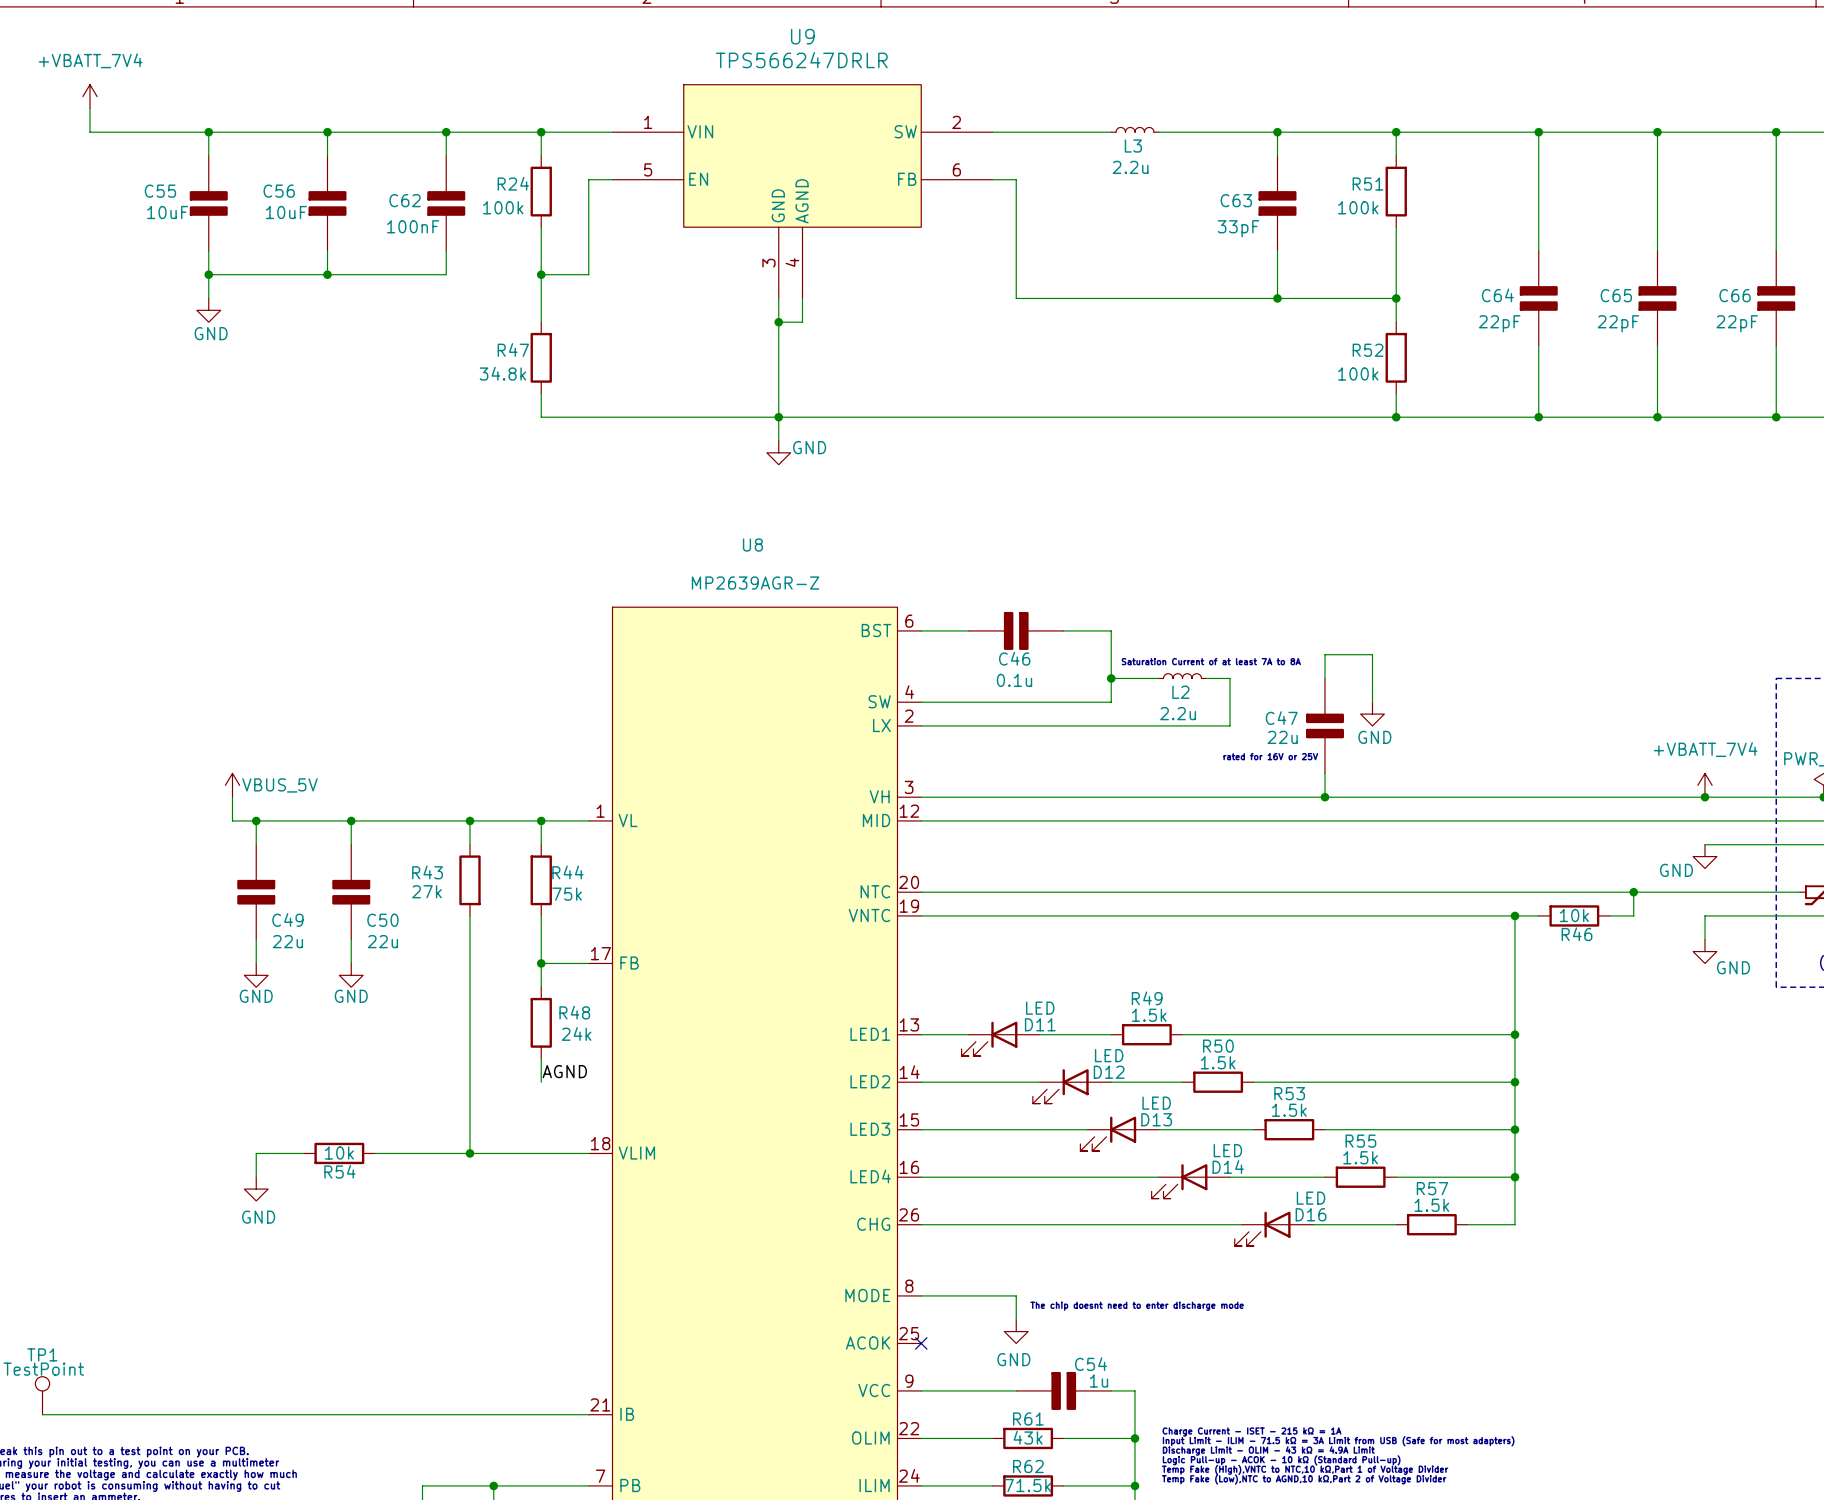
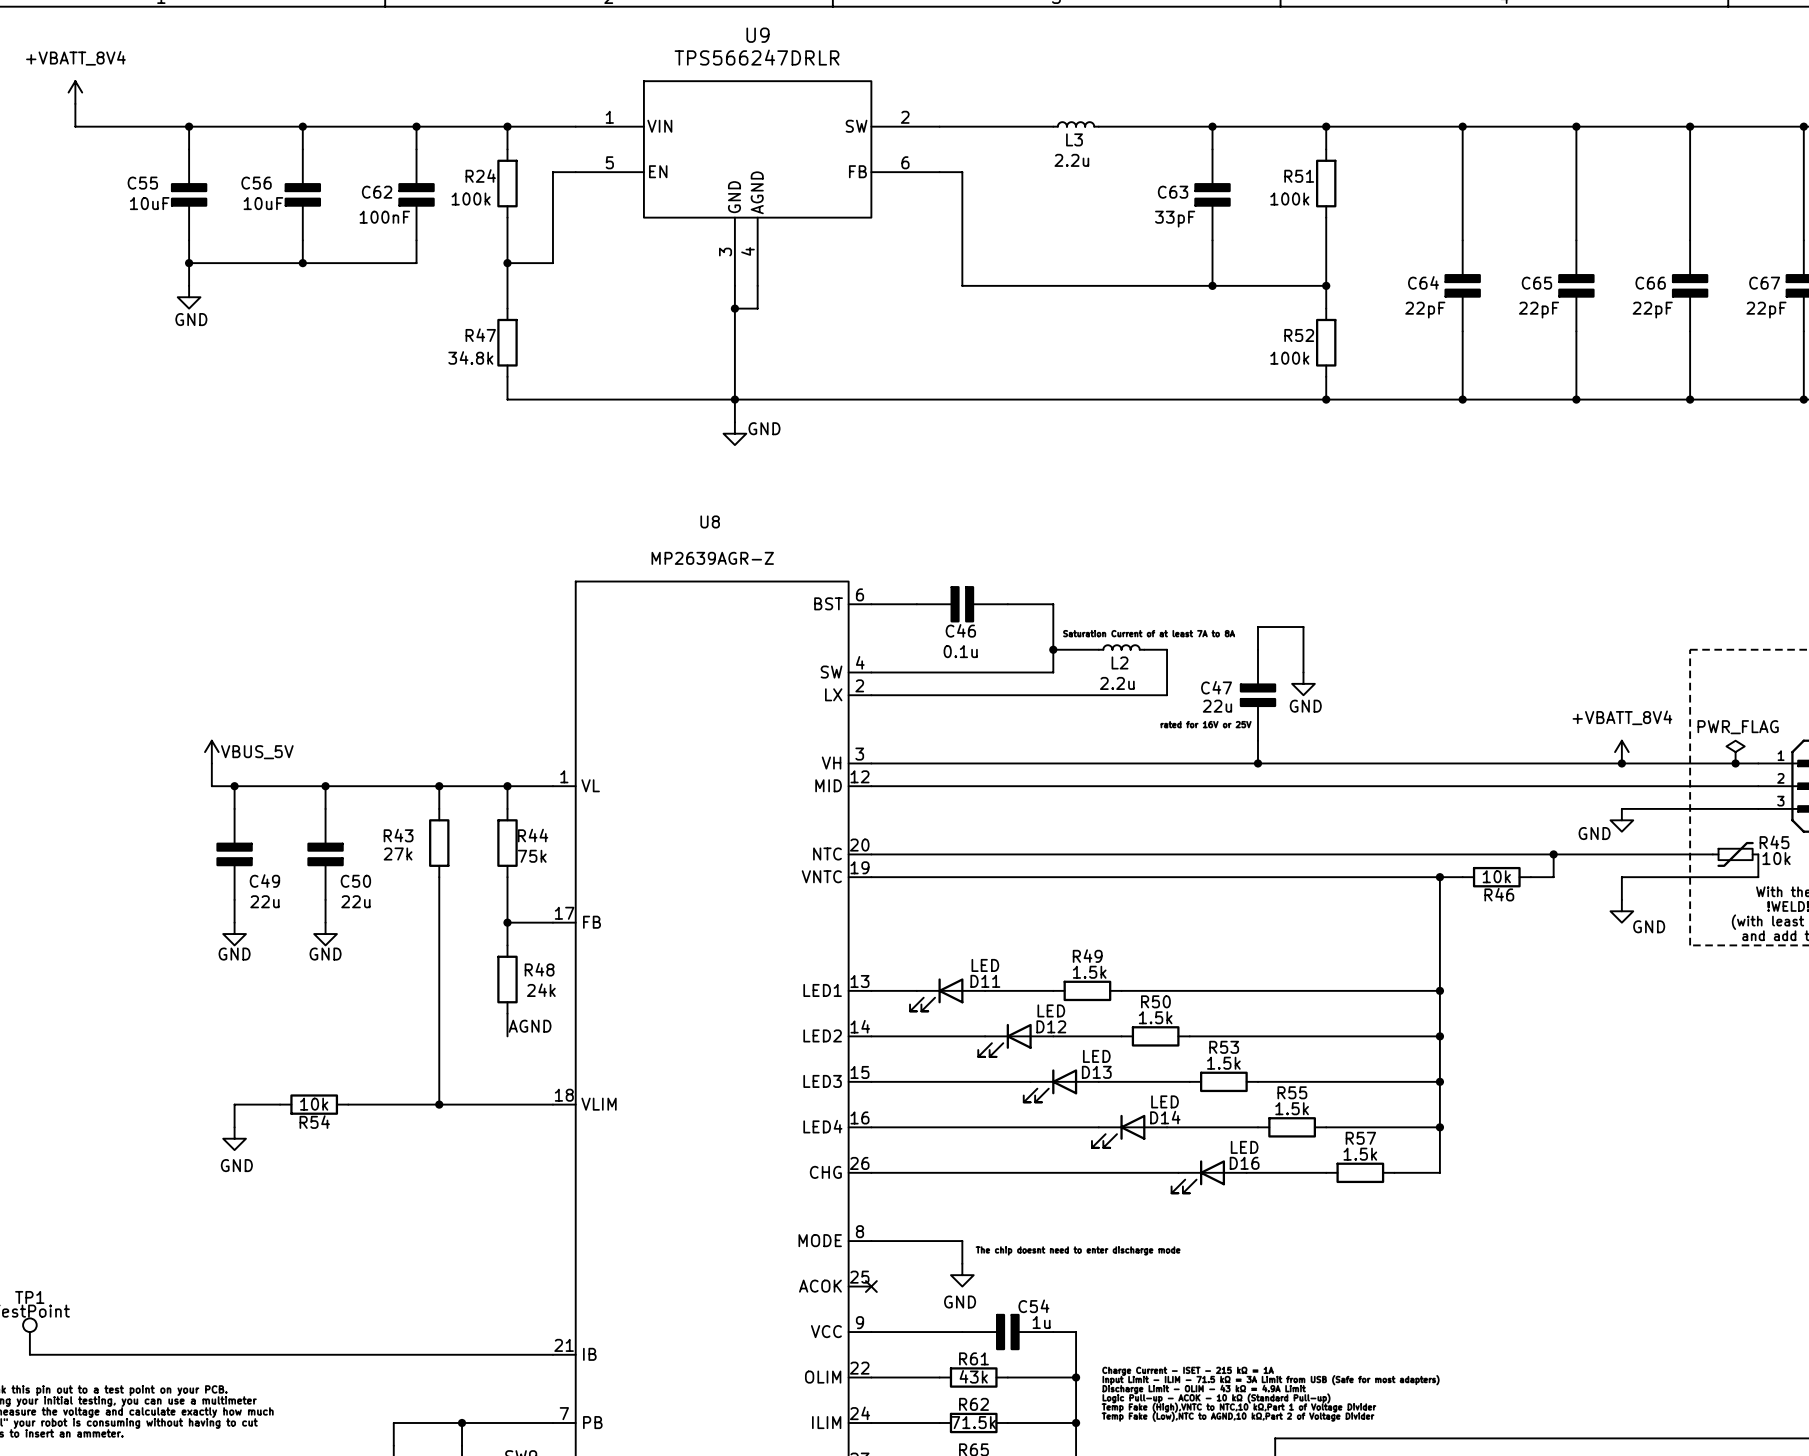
power symbol: +VBATT_7V4 (90, 96) -> +VBATT_8V4 (75, 92)
power symbol: +VBATT_7V4 (1704, 785) -> +VBATT_8V4 (1621, 752)

